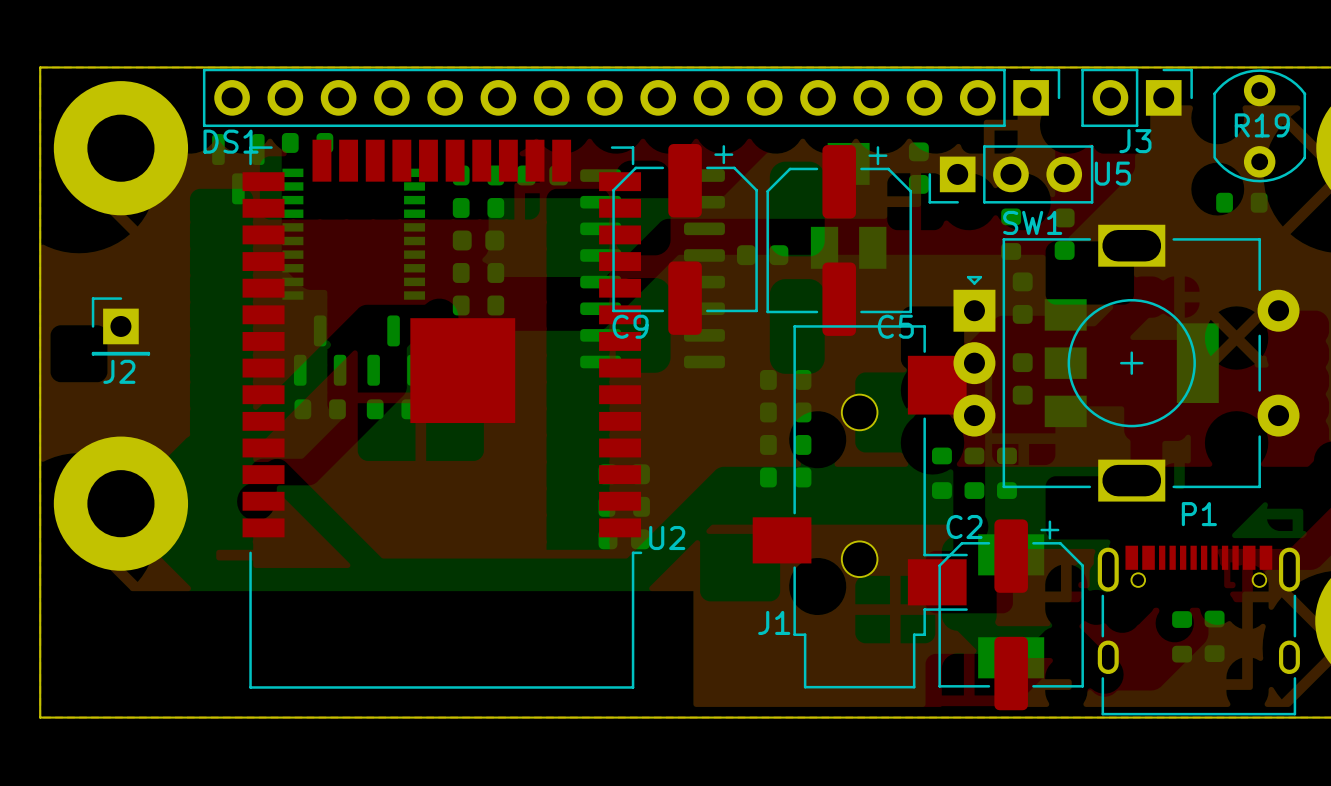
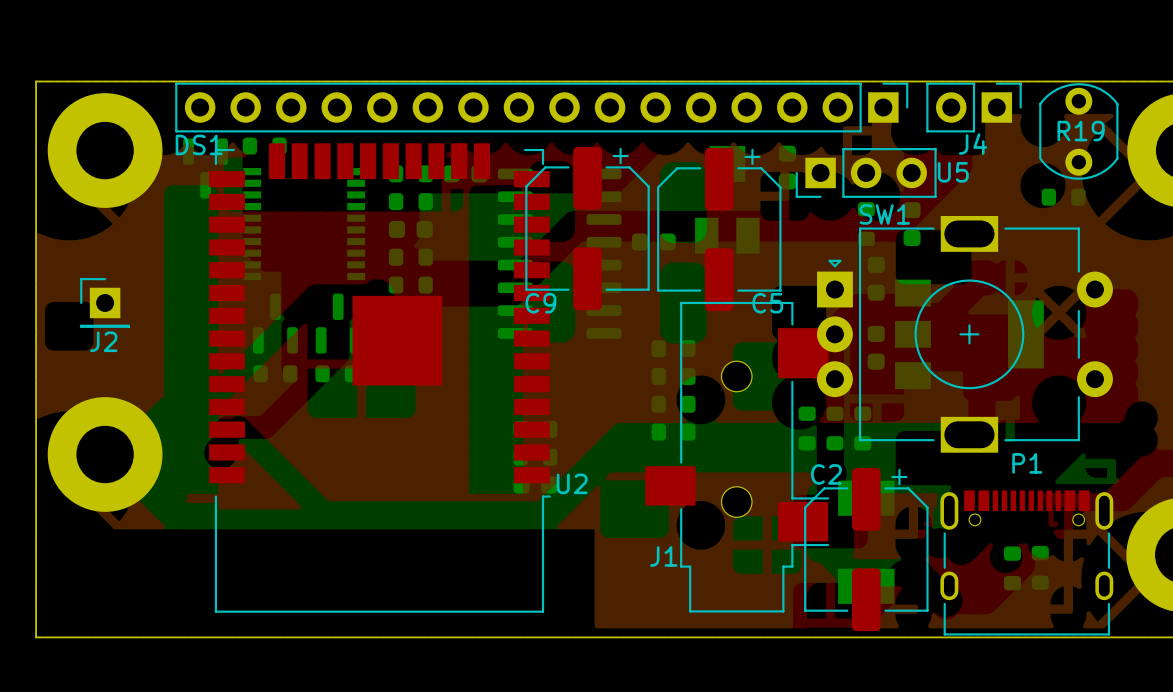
J3 name: J3 (1135, 141) -> J4 (973, 144)

